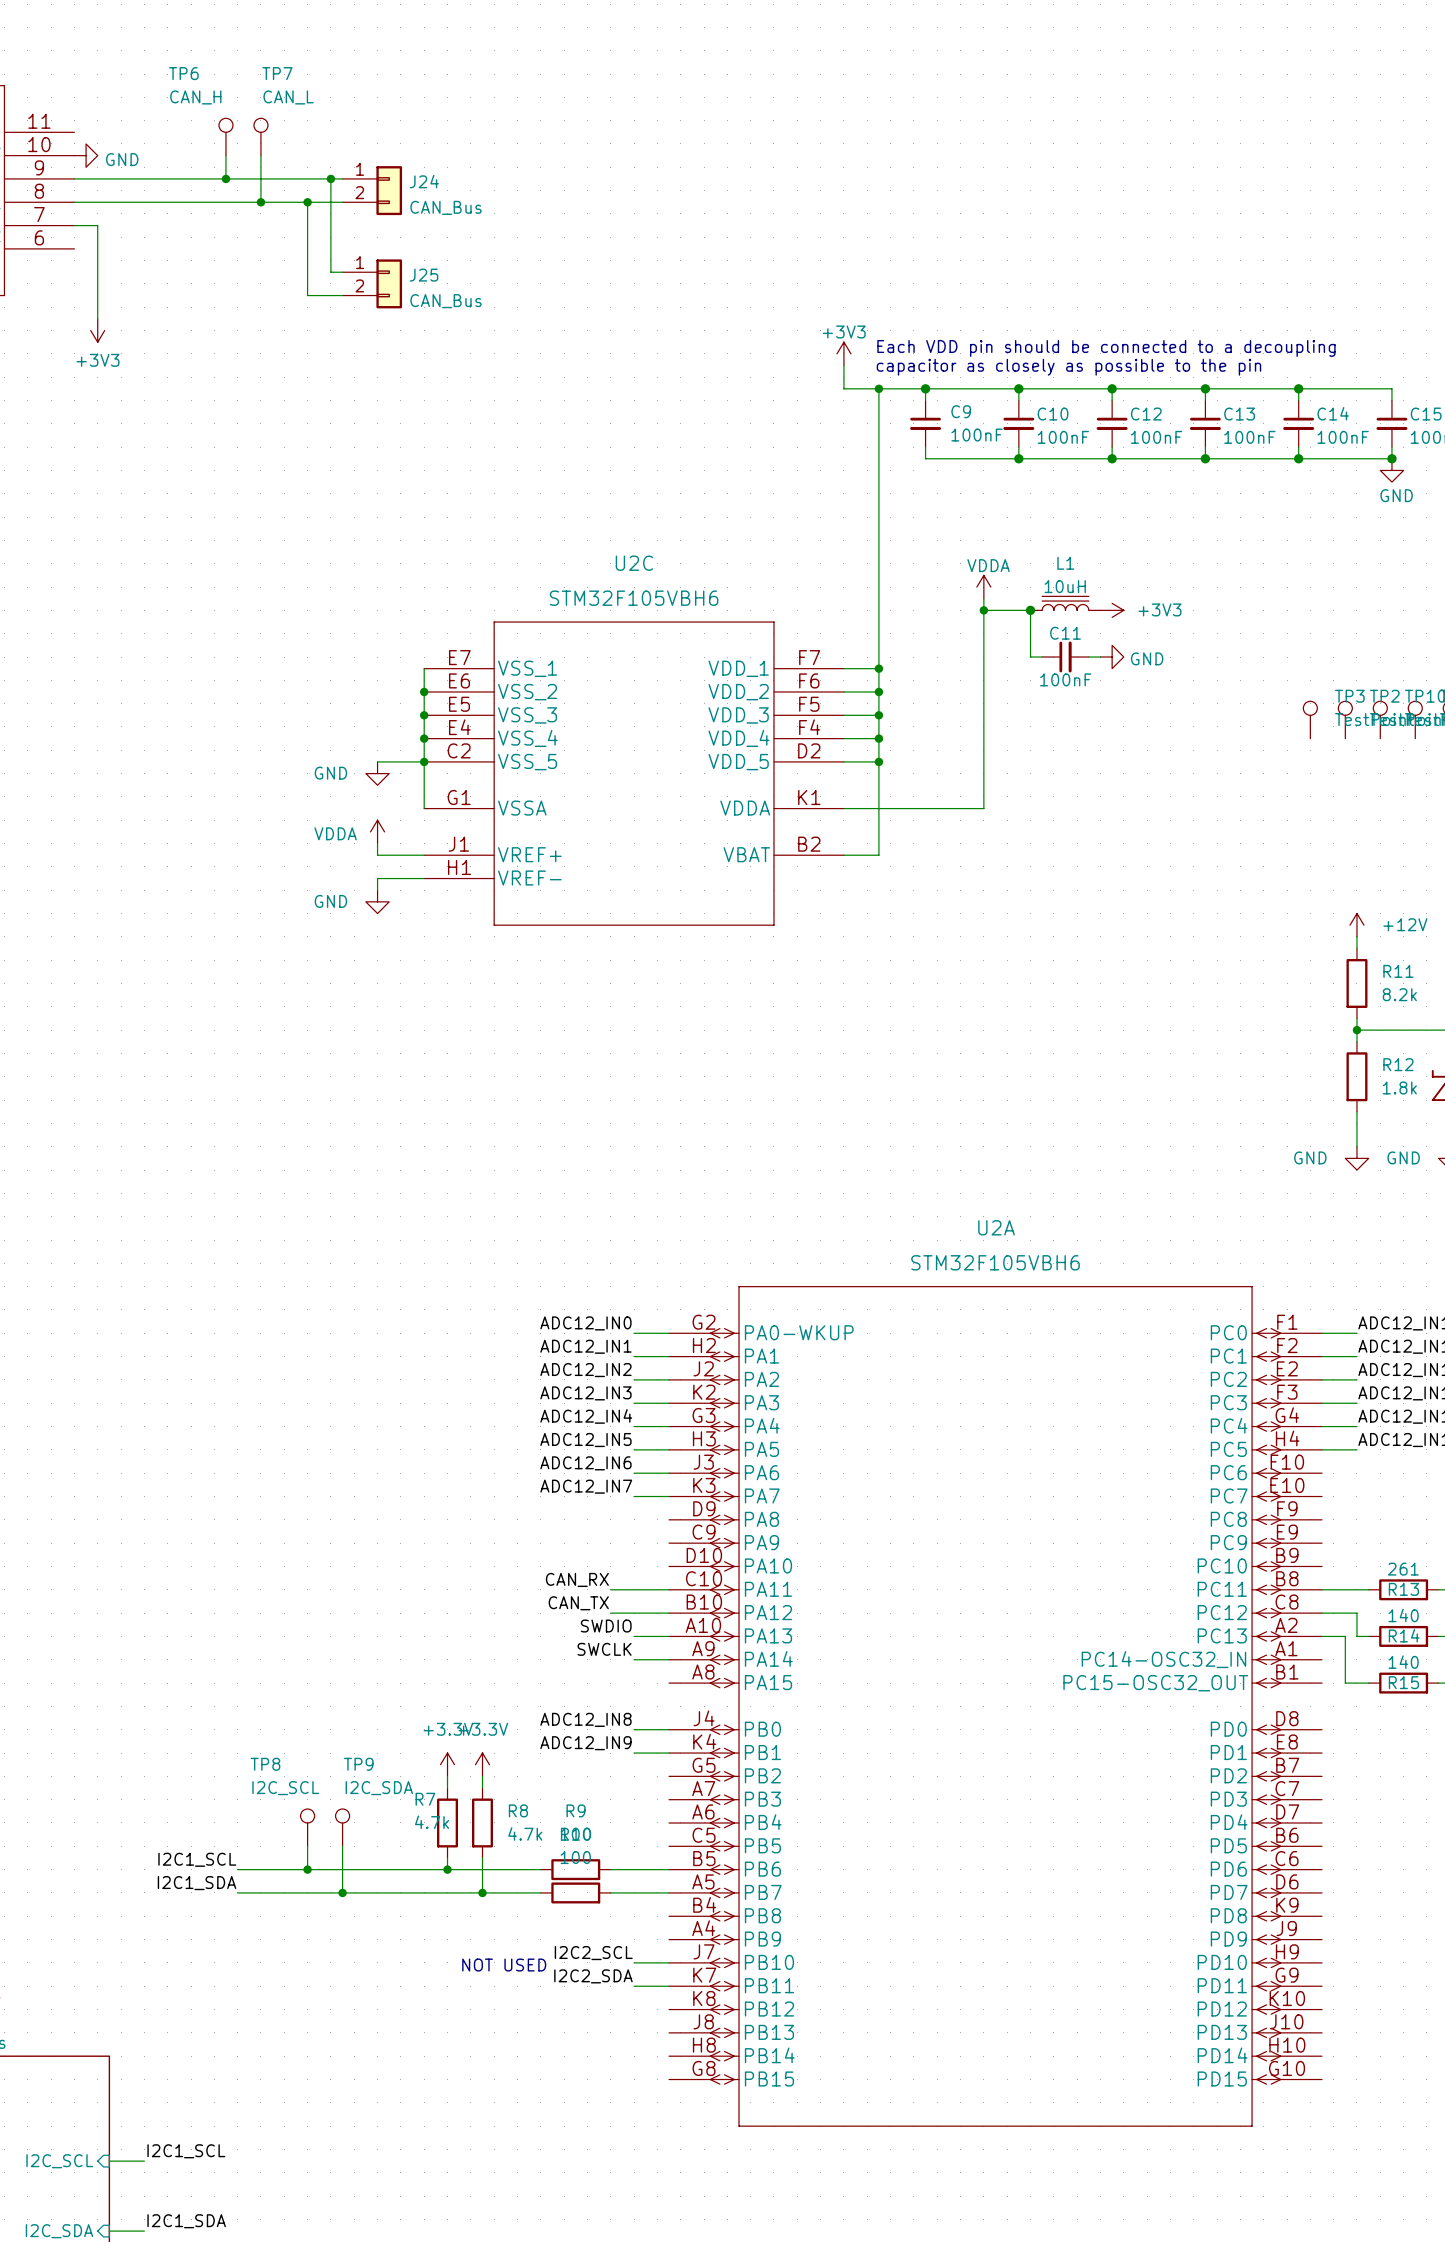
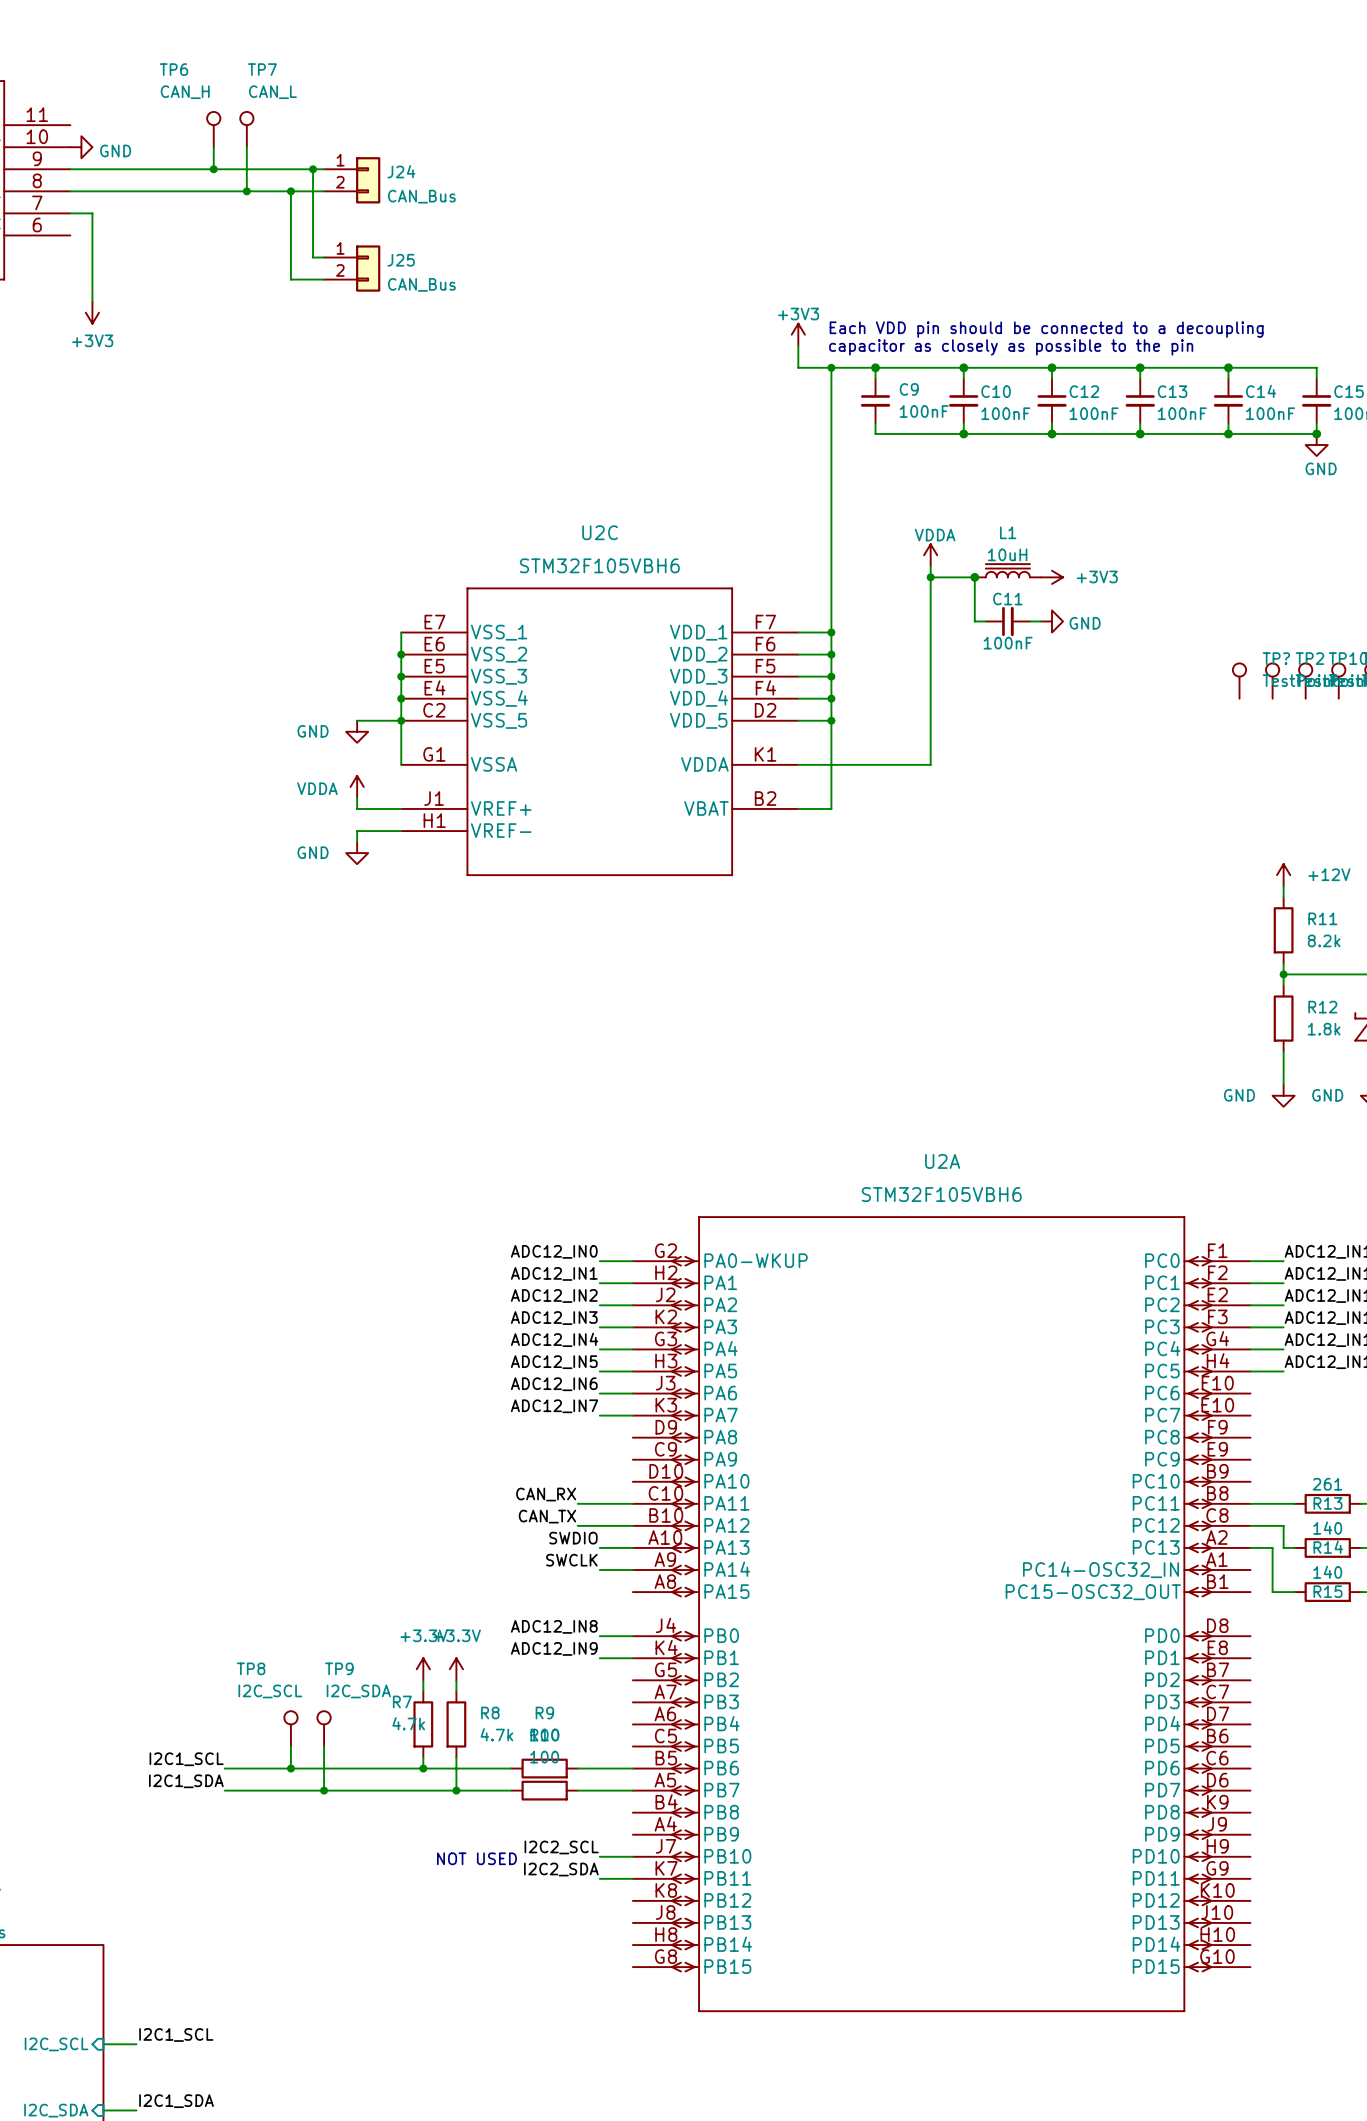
TP3 name: TP3 (1349, 696) -> TP? (1276, 658)

